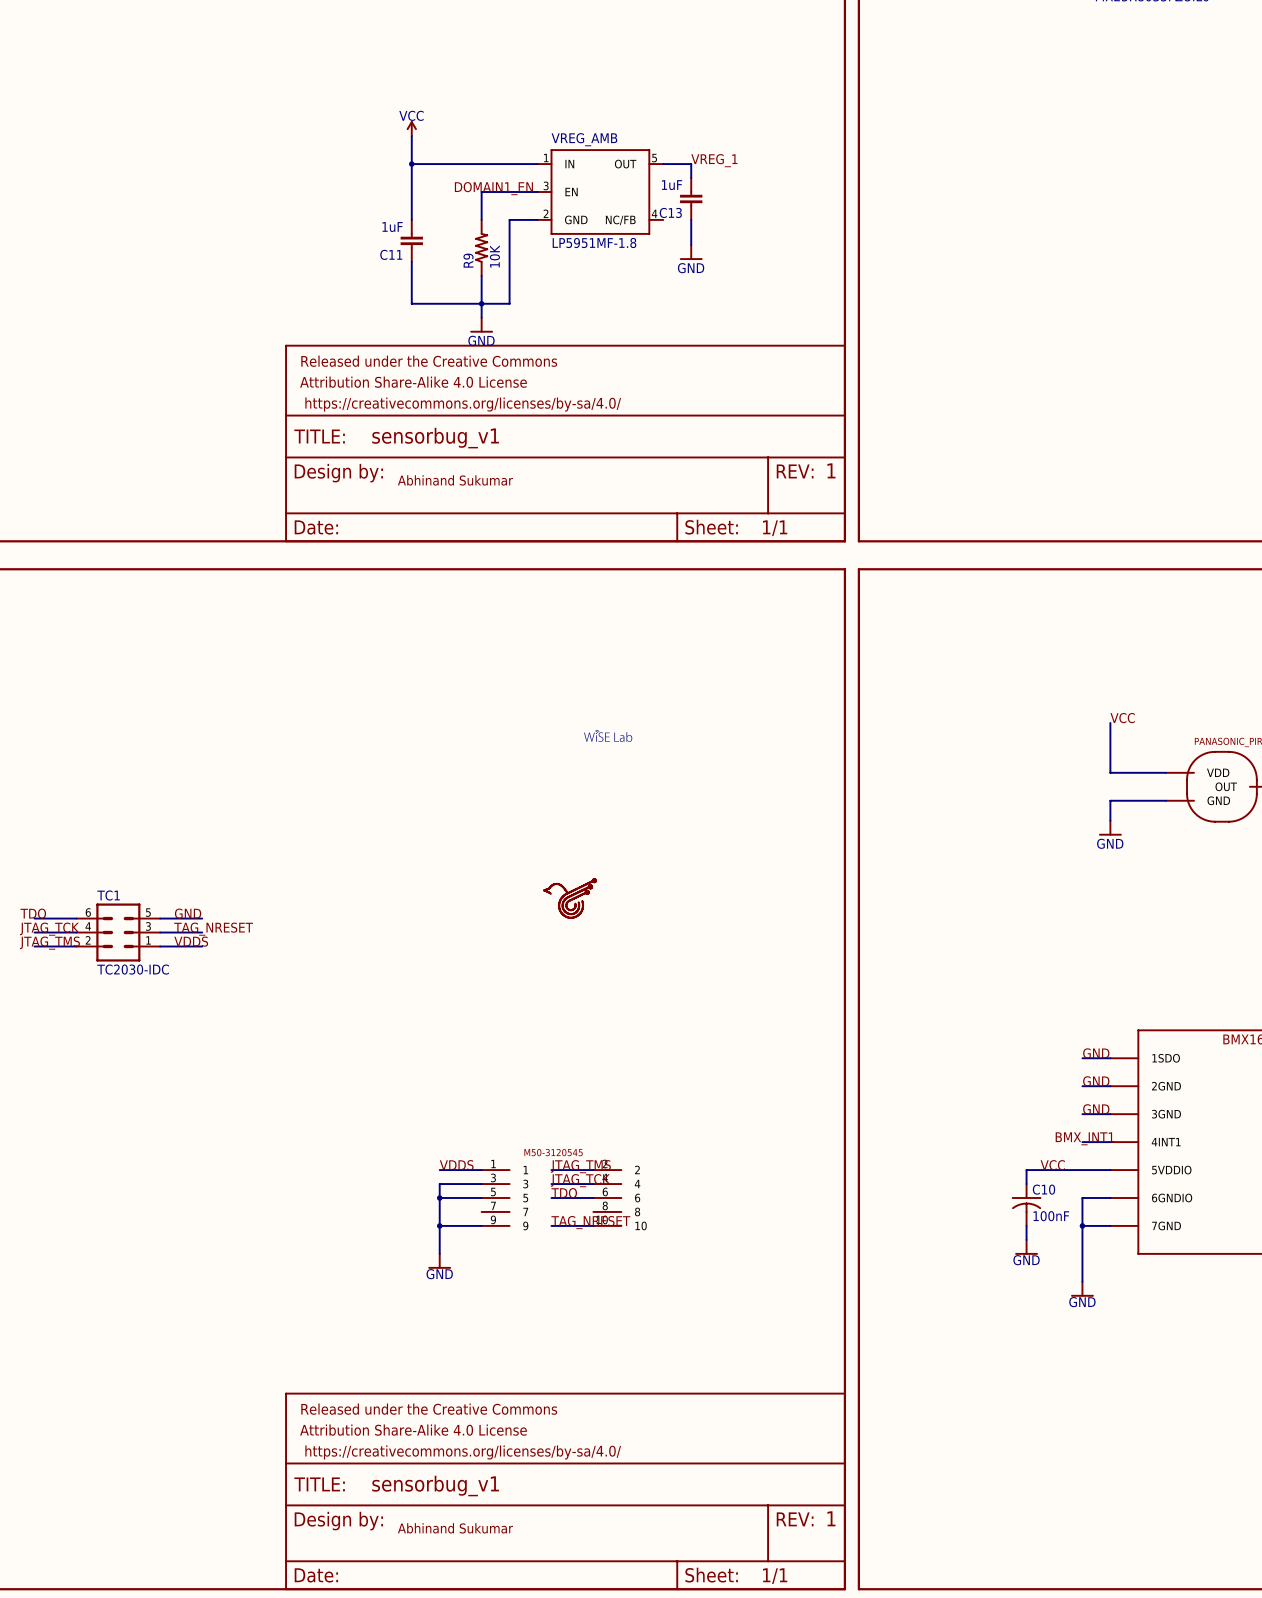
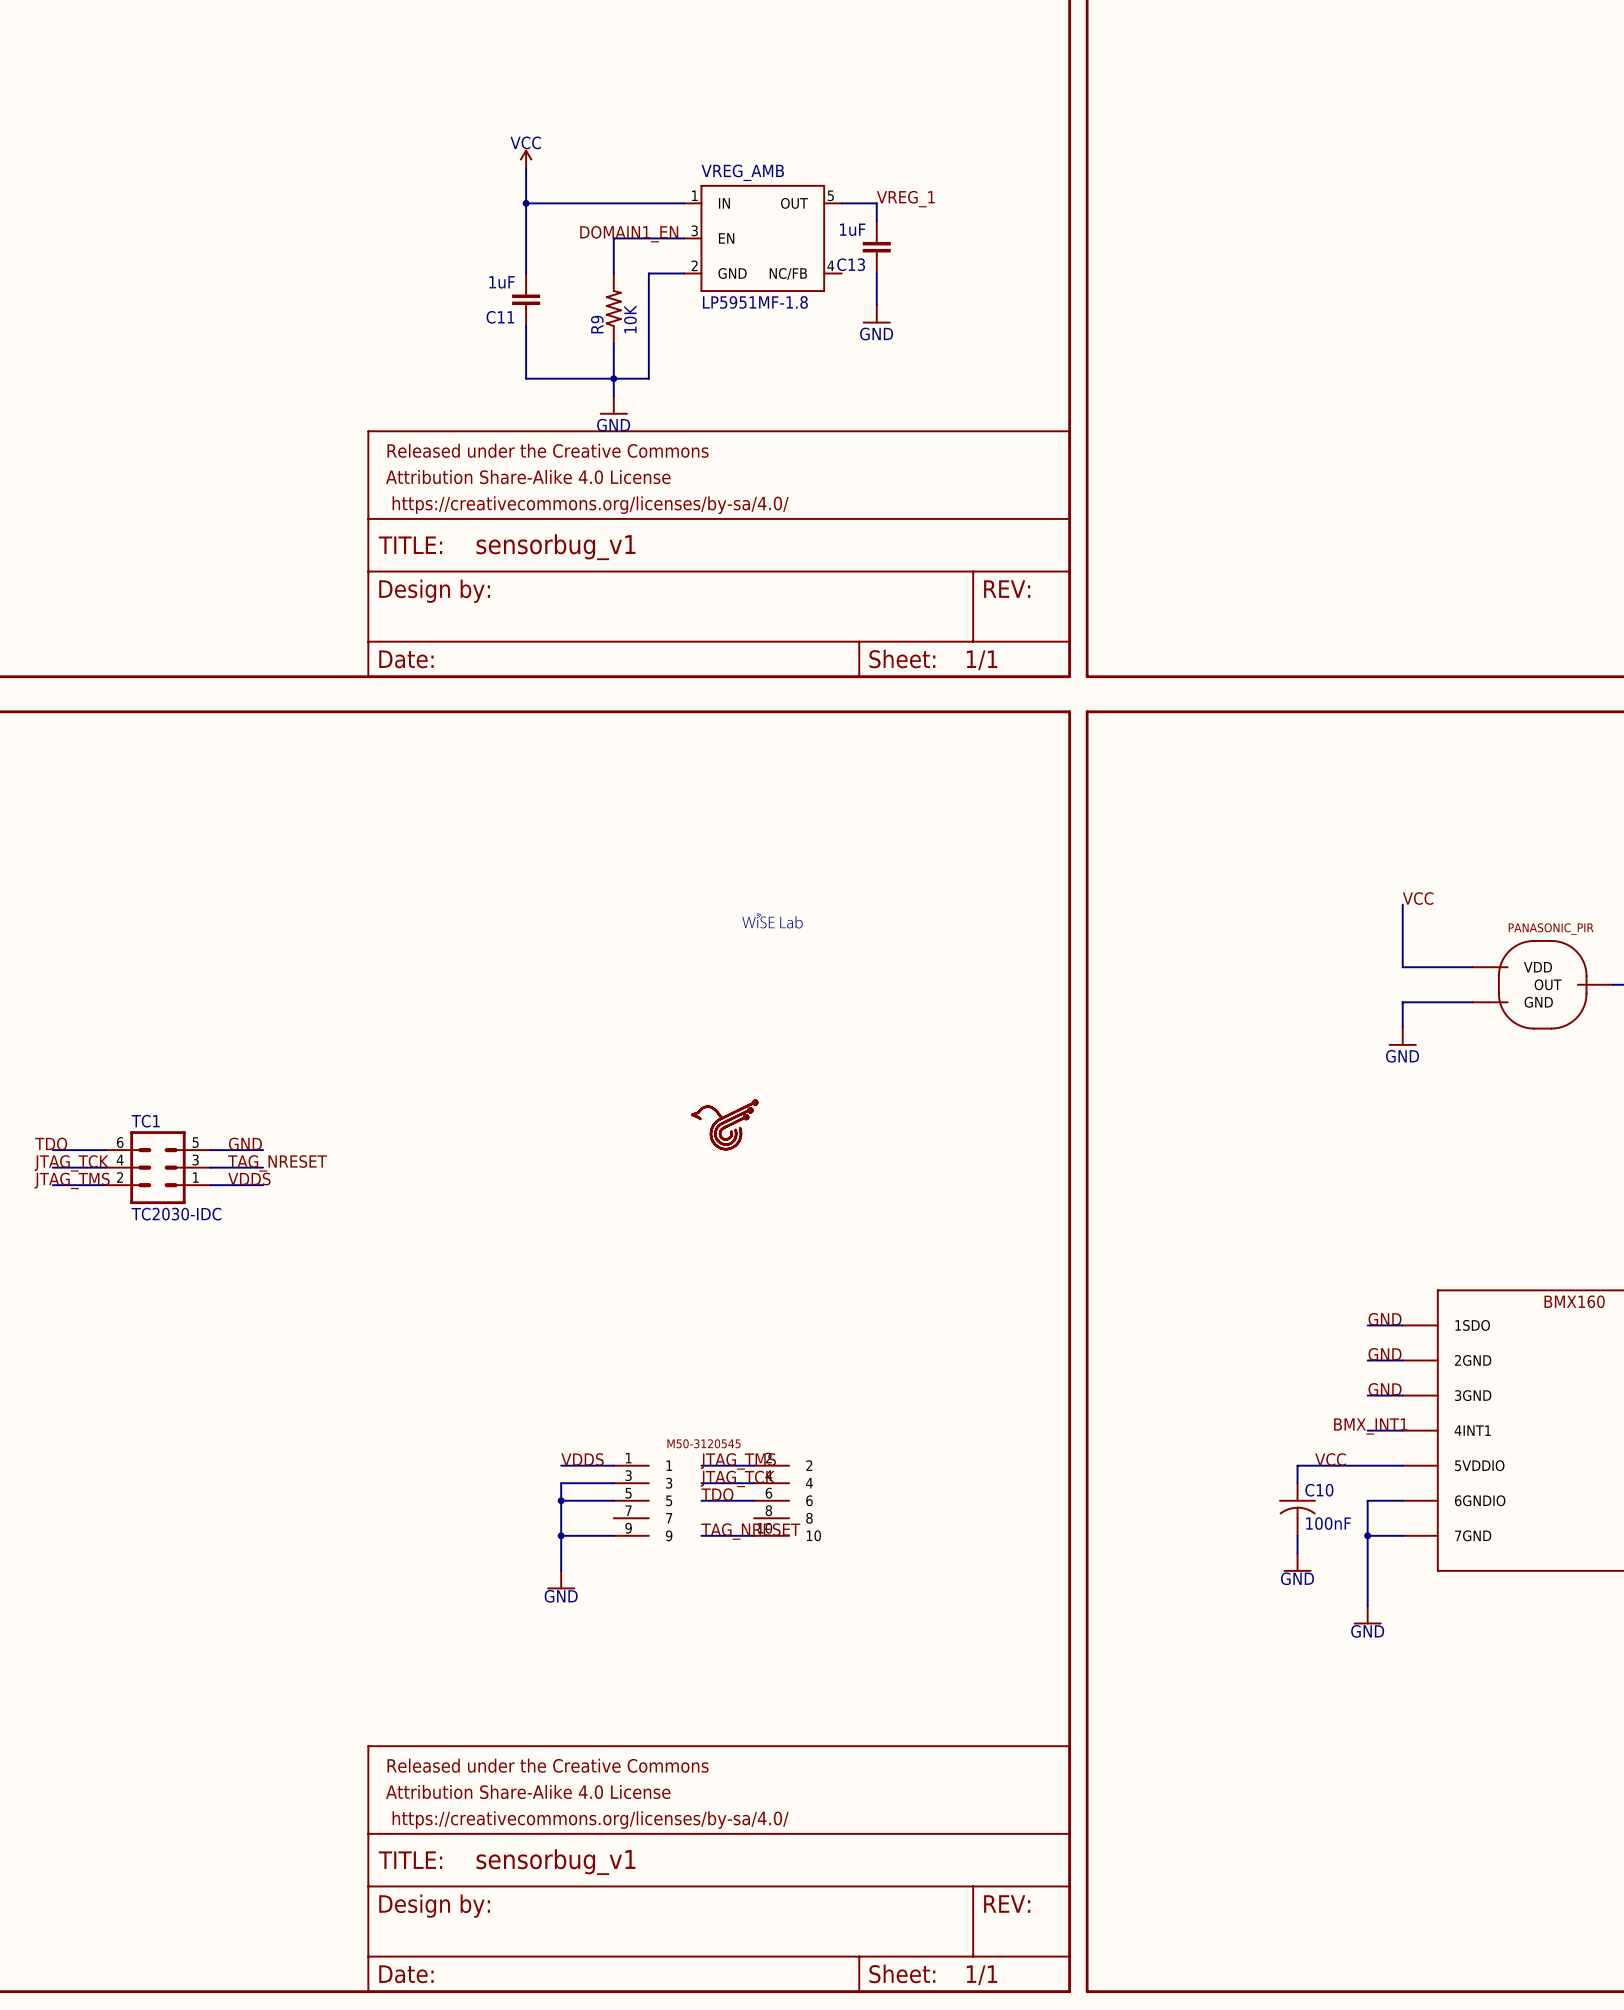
part text: 1 (831, 470) -> none
part text: Abhinand Sukumar (455, 480) -> none
part text: 1 (831, 1518) -> none
part text: Abhinand Sukumar (455, 1528) -> none

